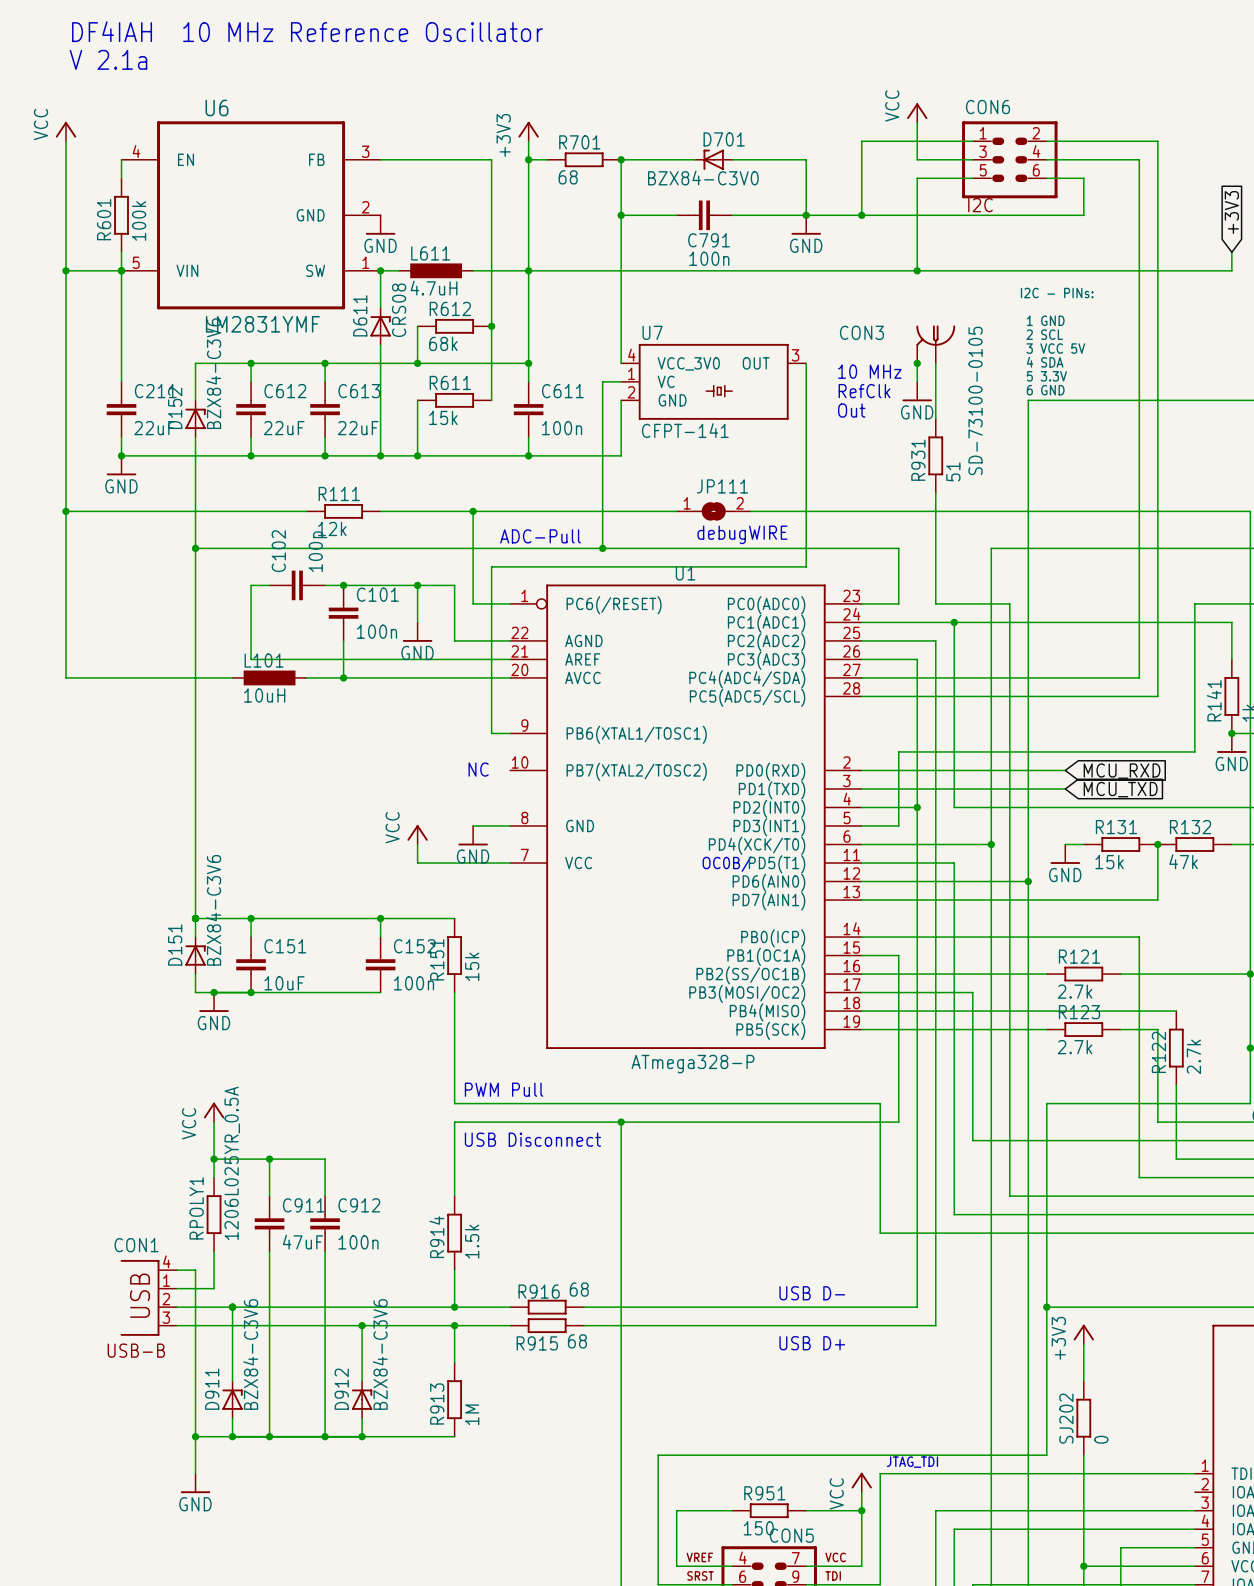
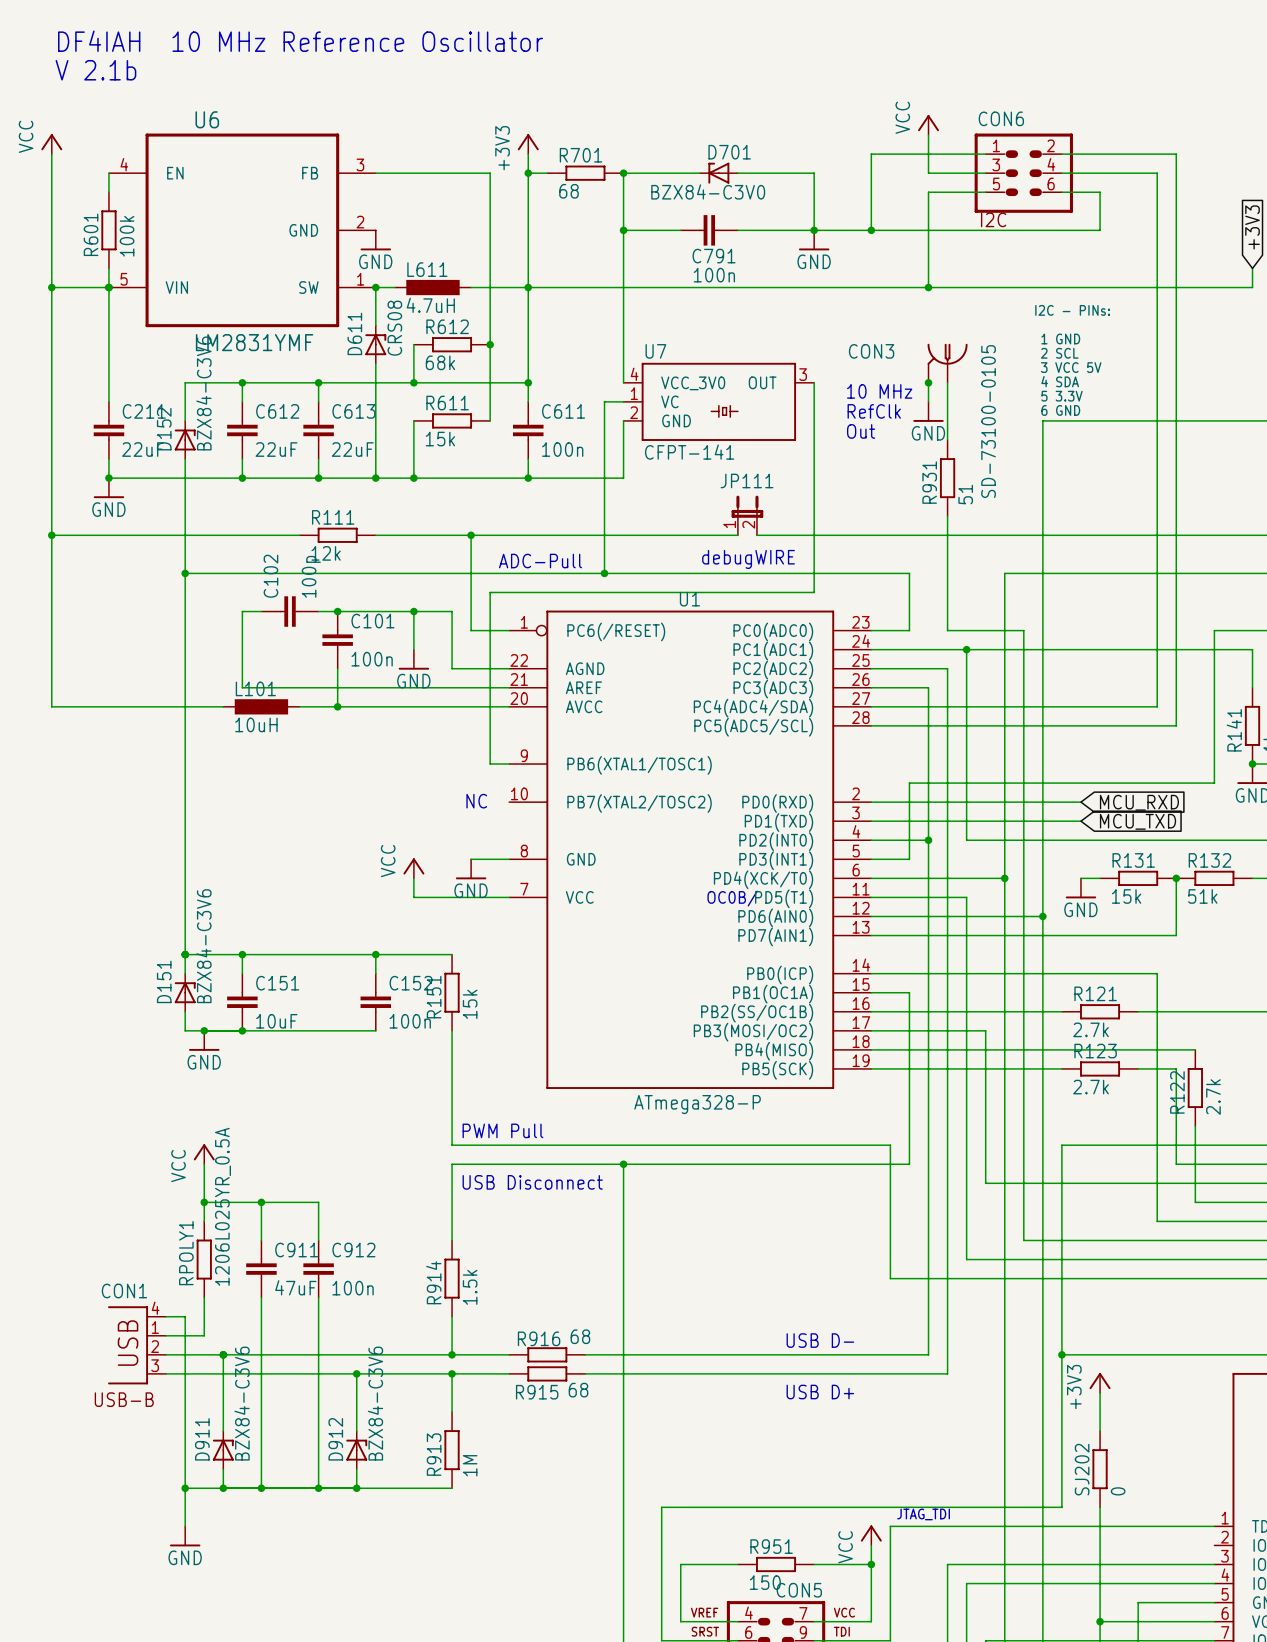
text: V 2.1a (108, 59) -> V 2.1b (95, 70)
JP111 symbol: [676, 502, 751, 521] -> [731, 495, 764, 536]
R132 value: 47k (1183, 861) -> 51k (1202, 896)

